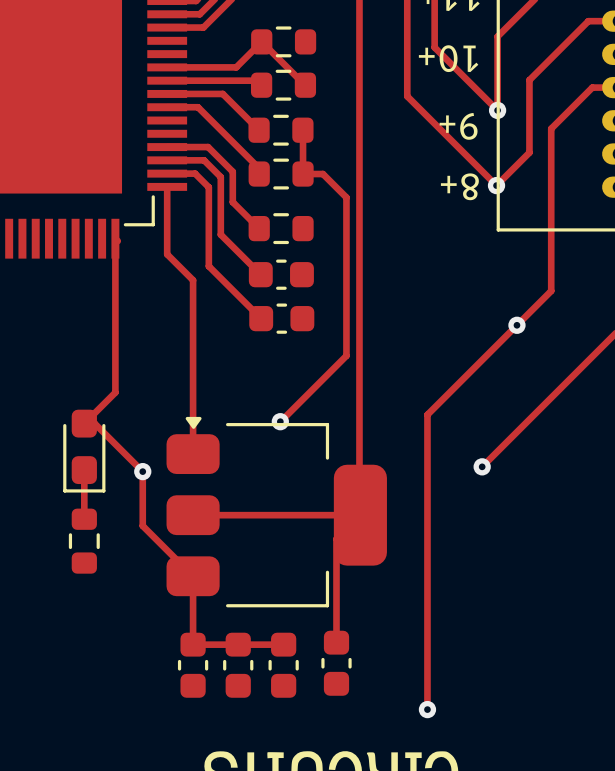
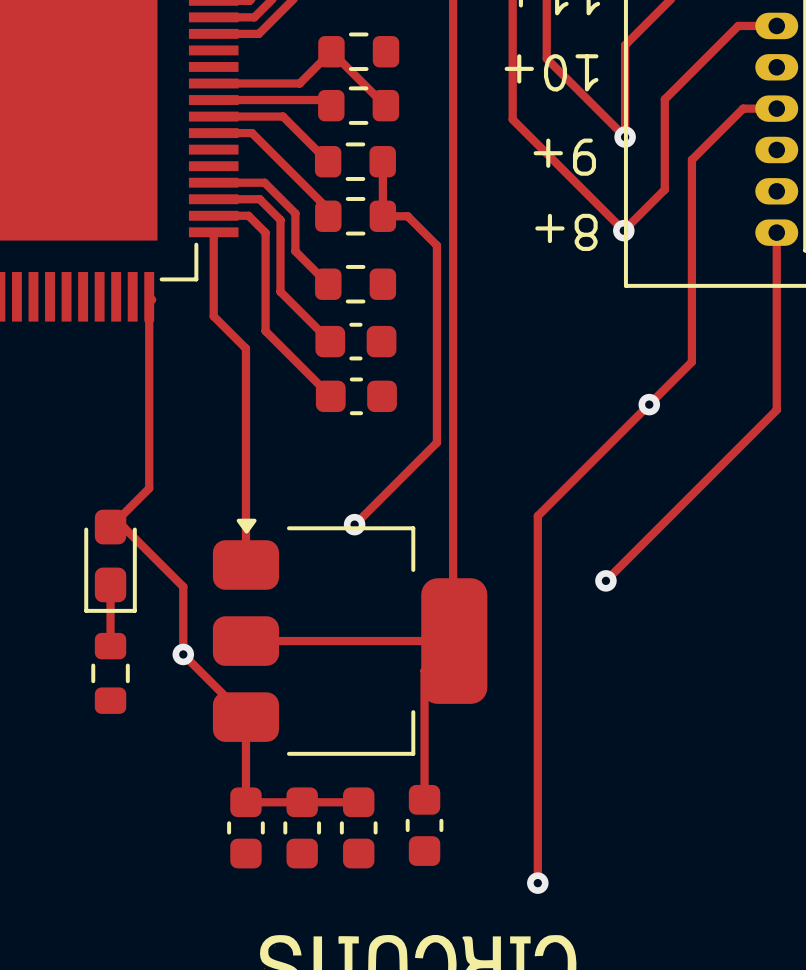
via position: (142, 471) -> (183, 654)

